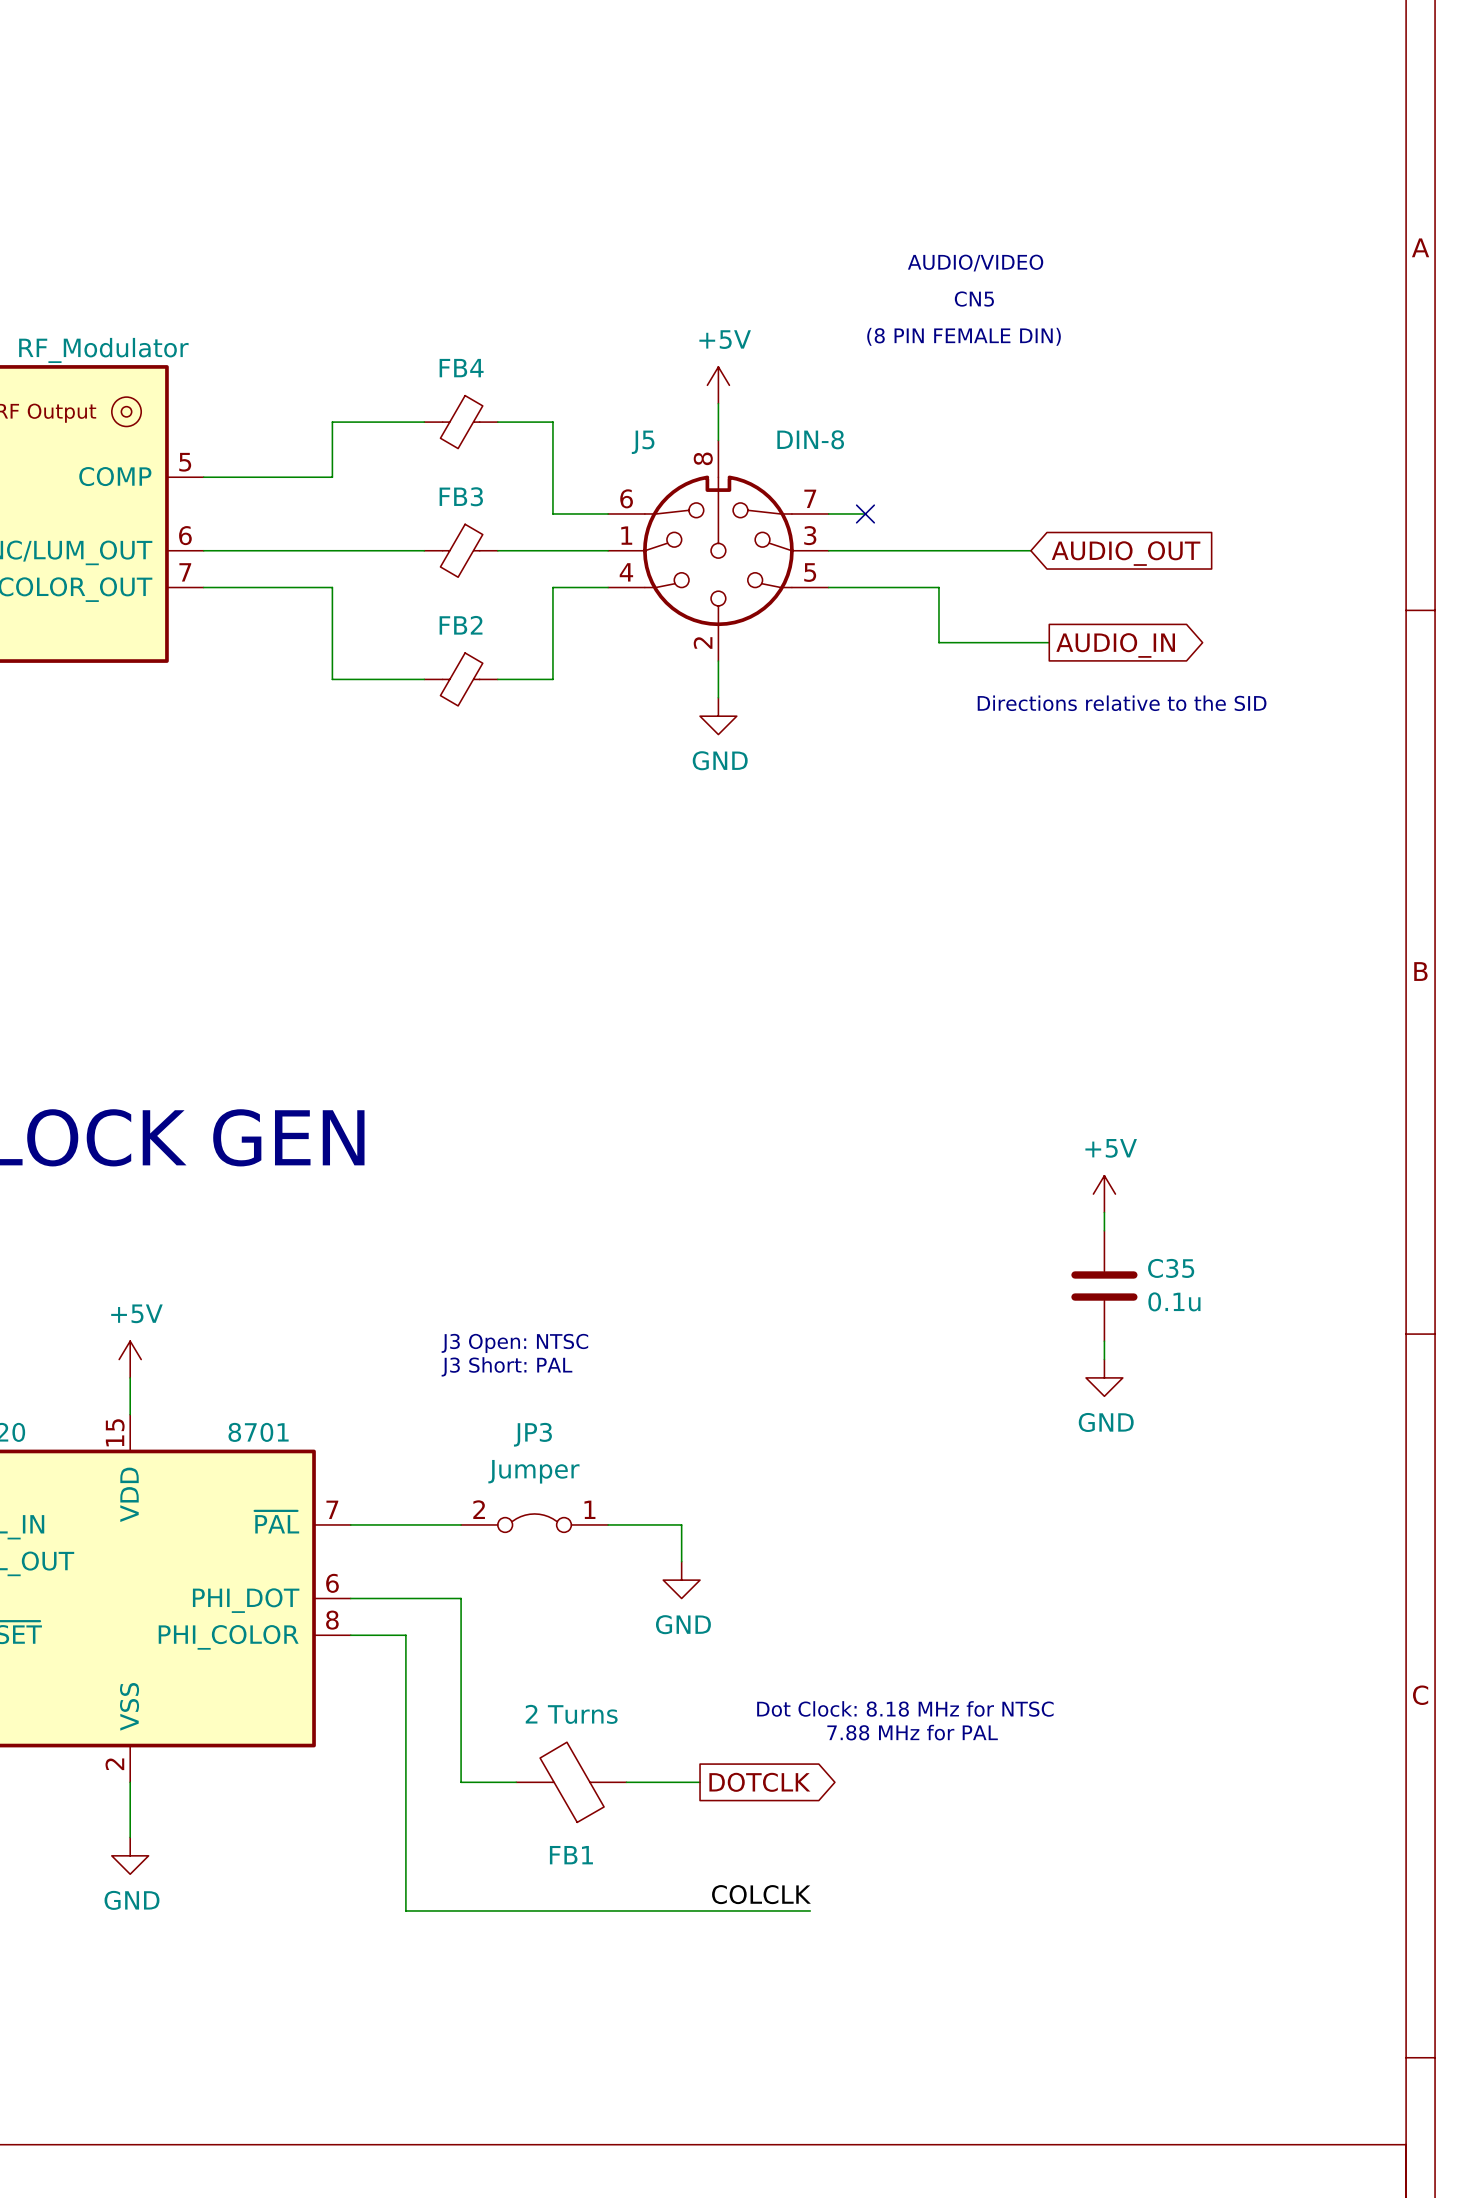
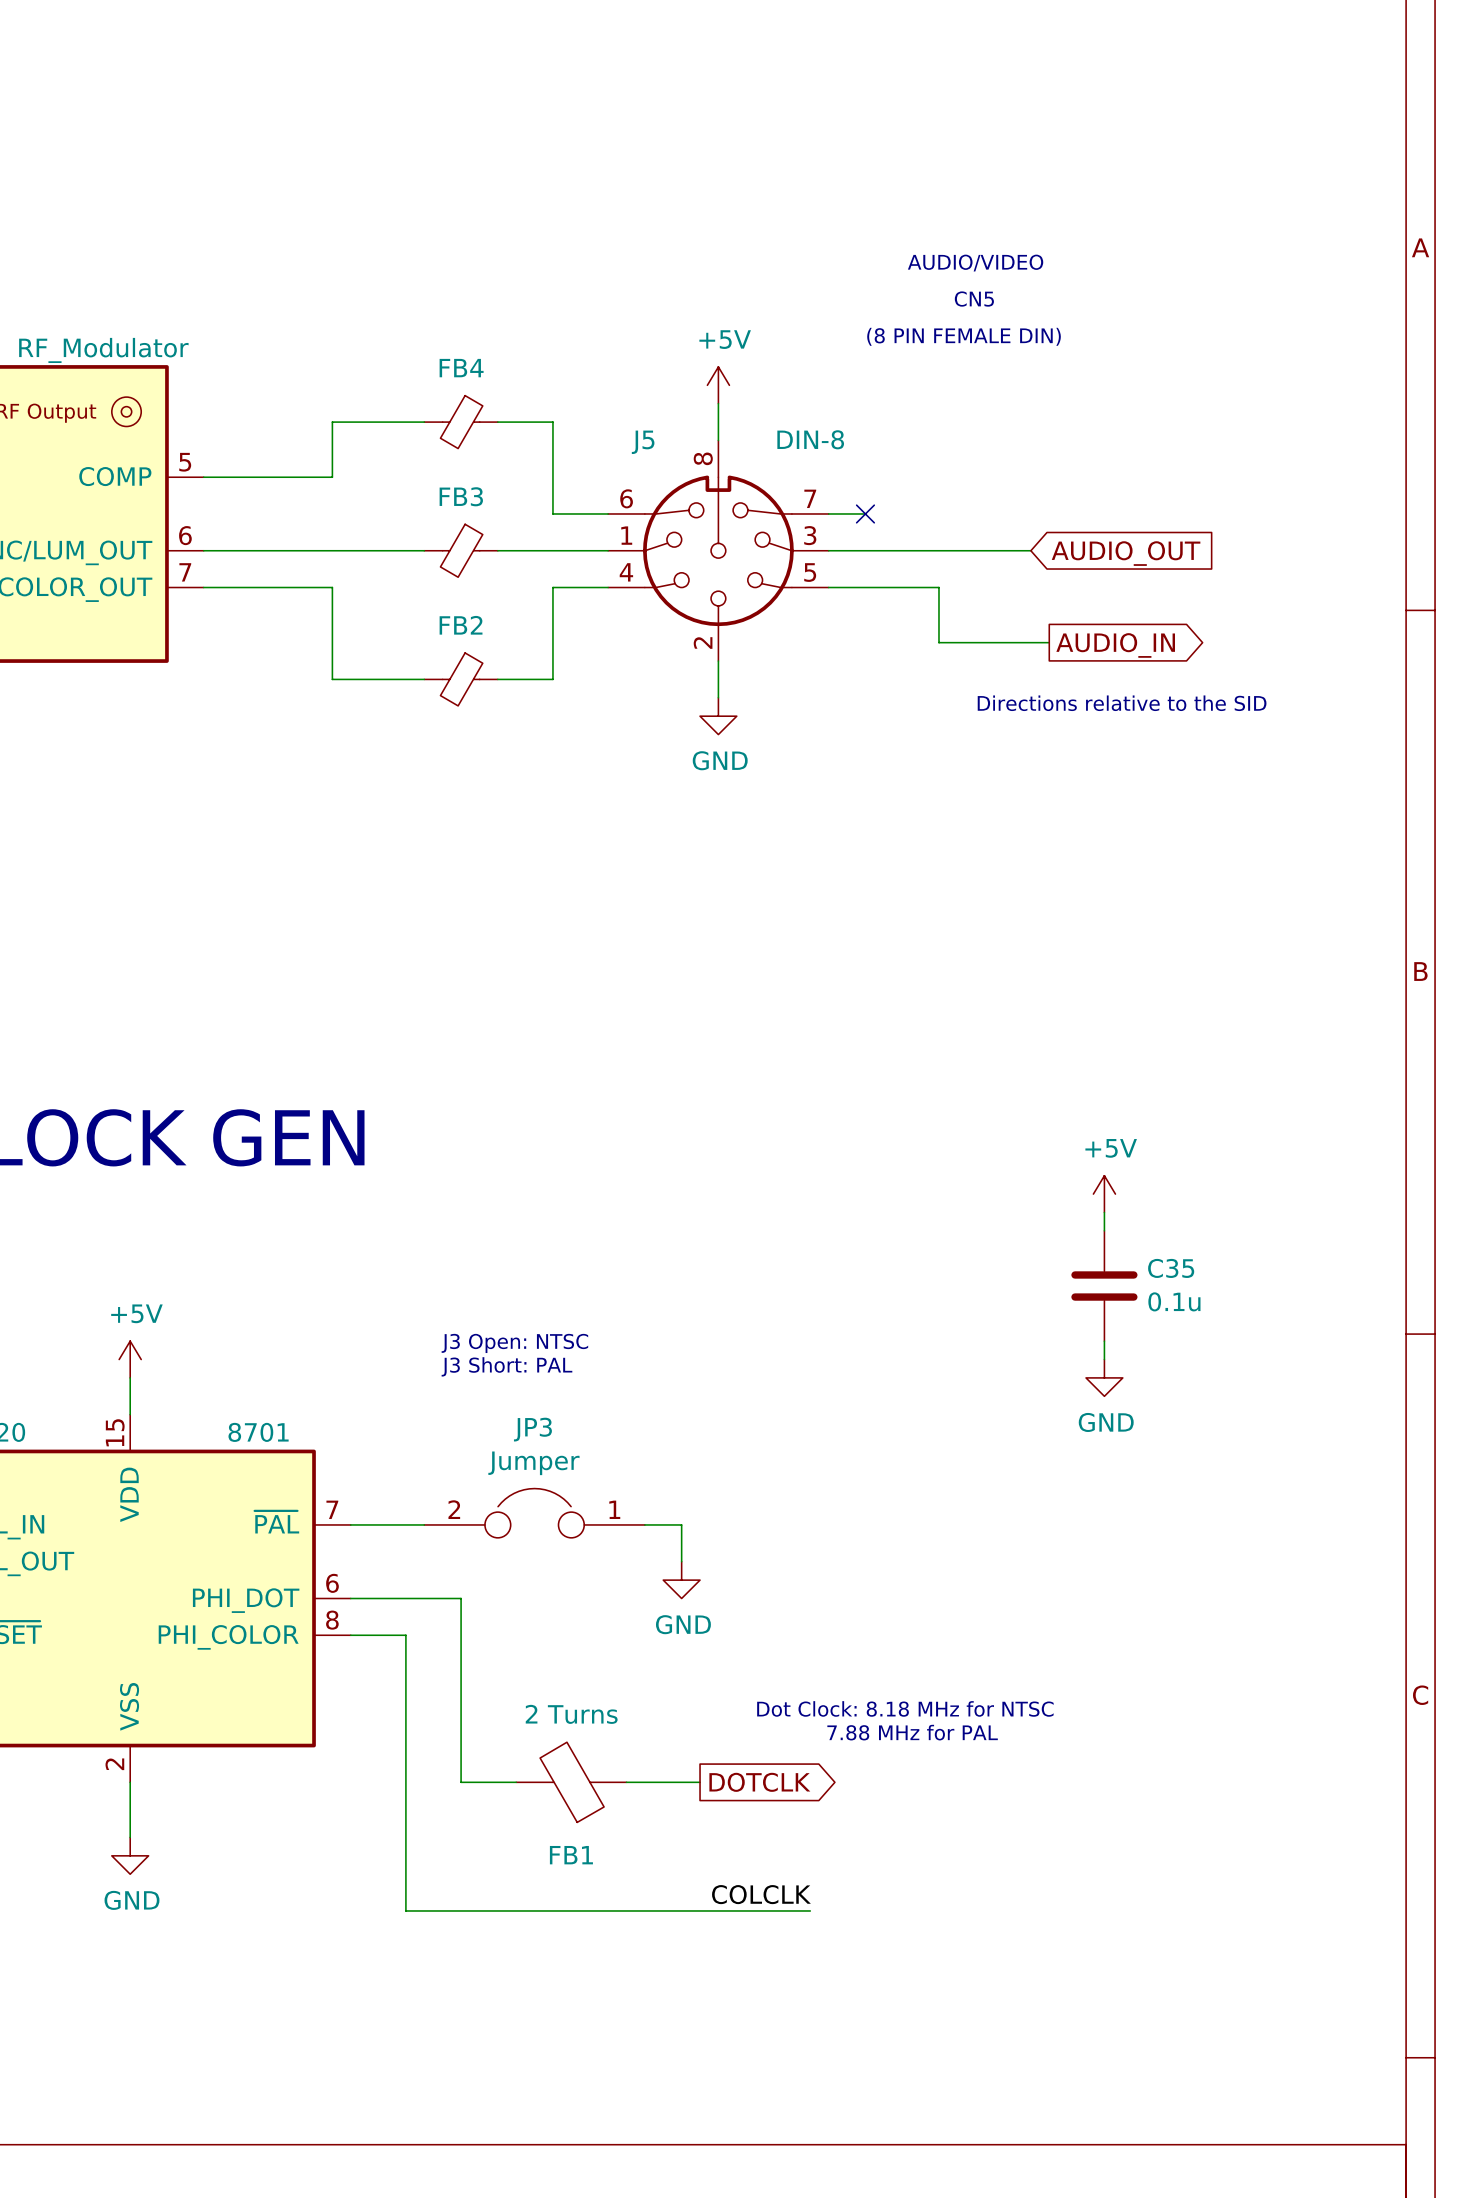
JP3 symbol: [461, 1513, 609, 1533] -> [424, 1488, 645, 1538]

